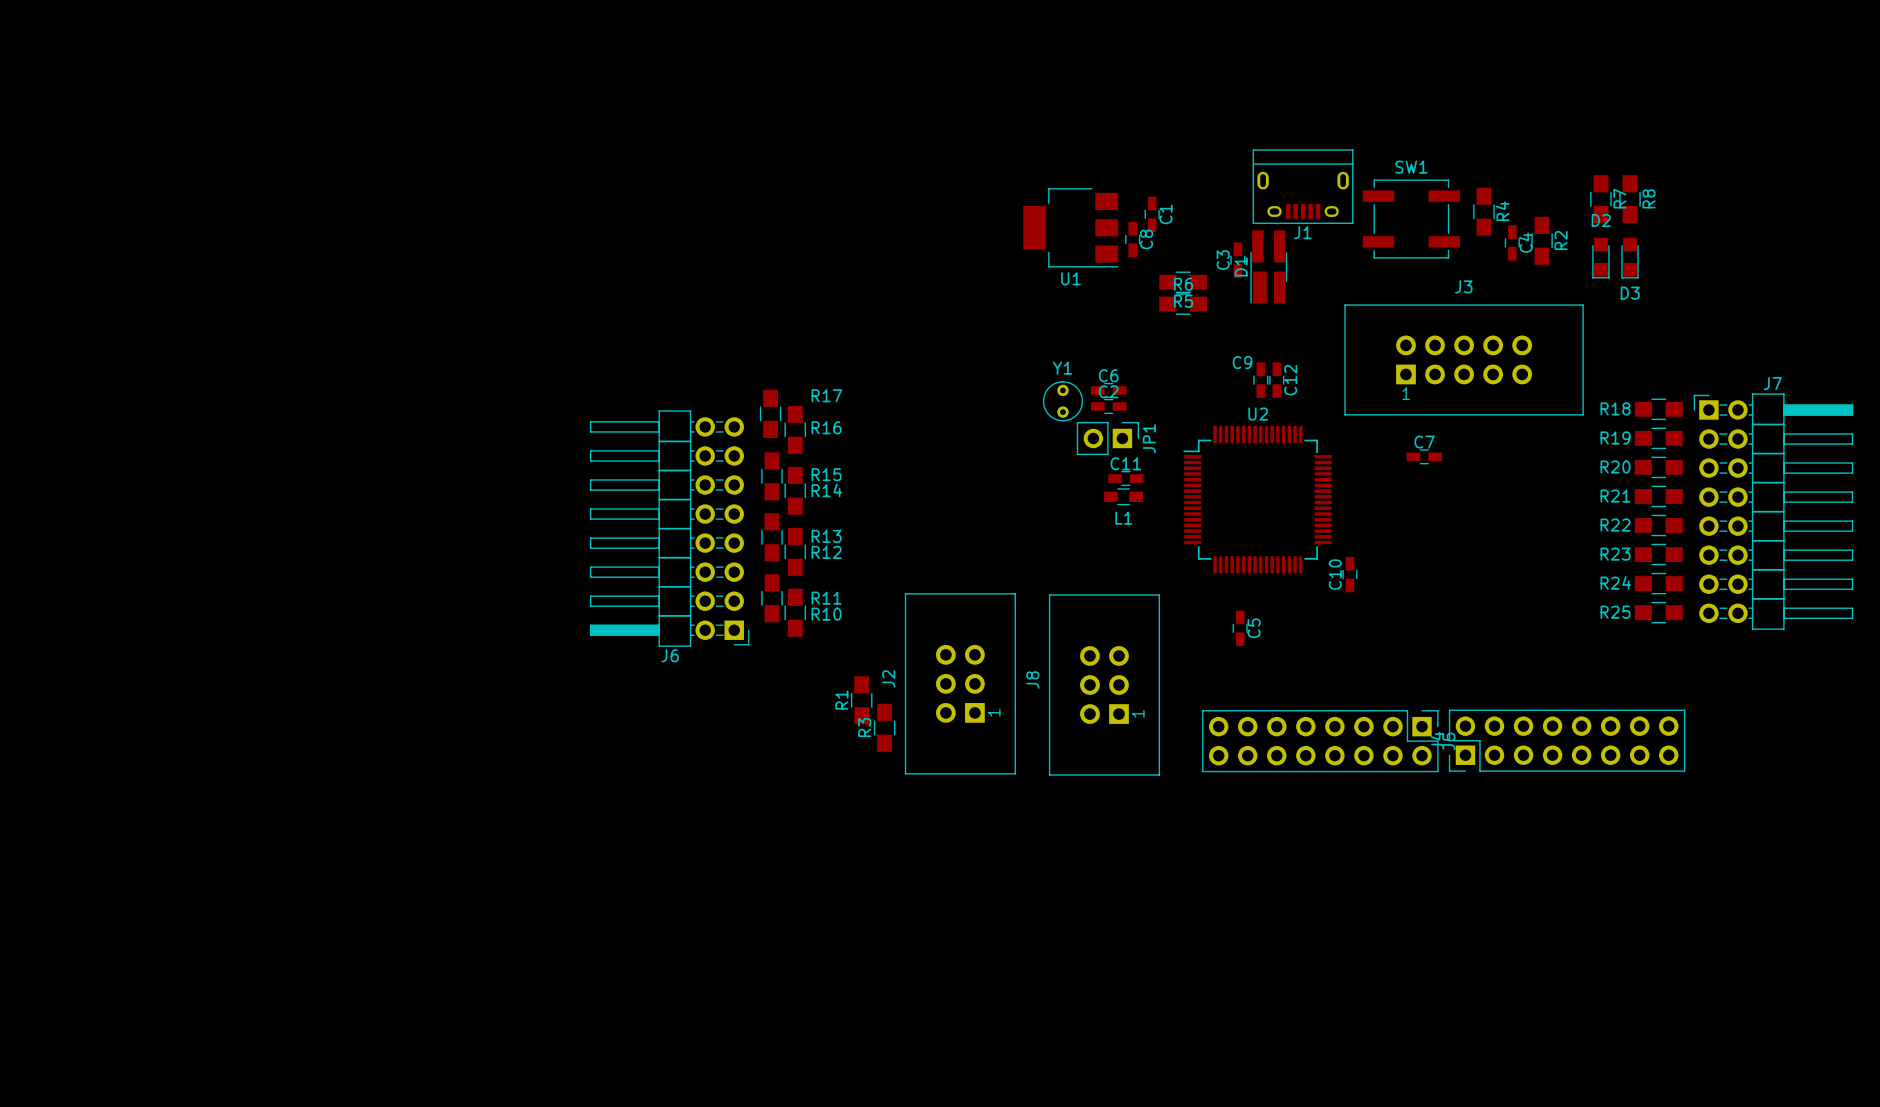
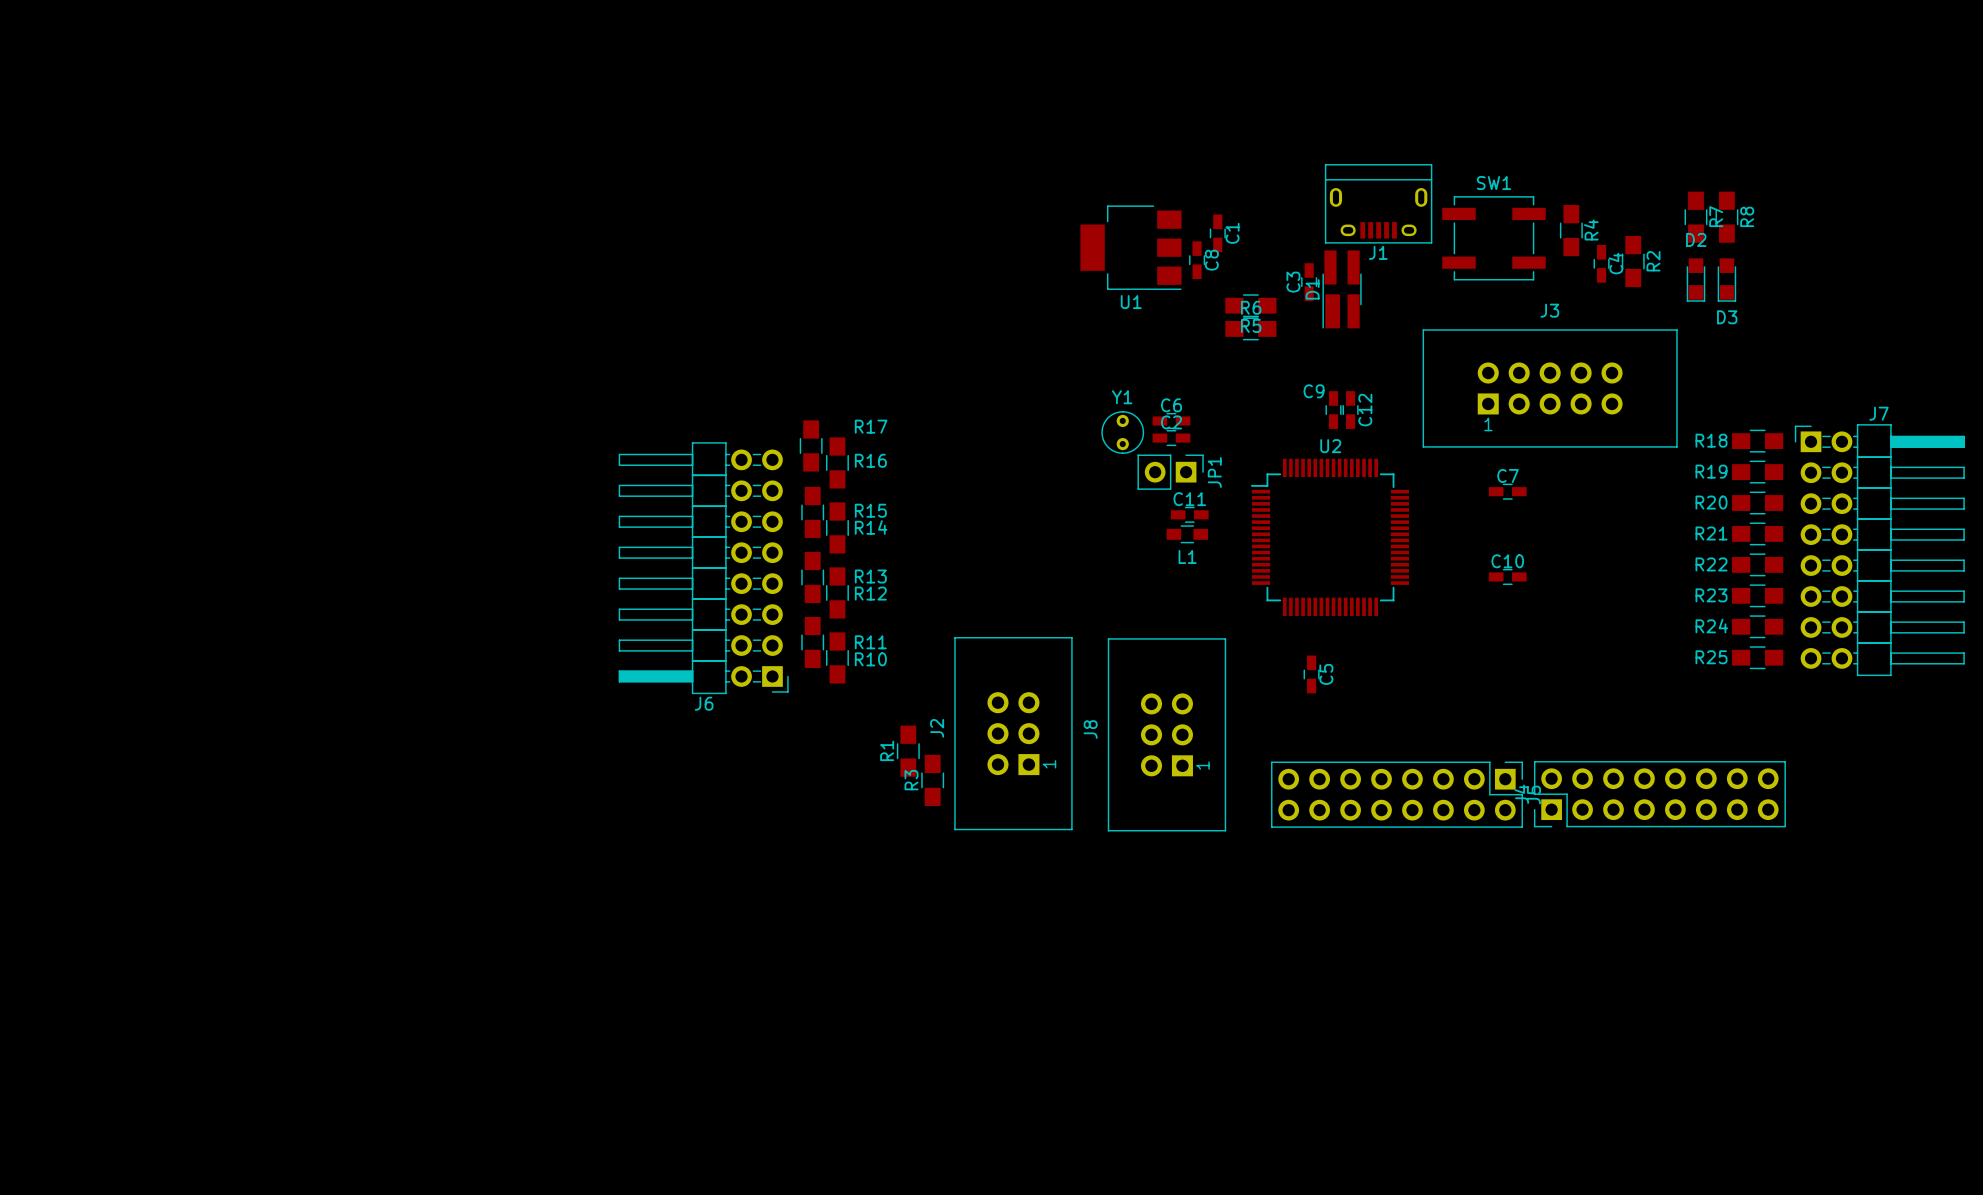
C10 rotation: 0° (1349, 574) -> 90° clockwise (1507, 576)
C10 position: (1349, 574) -> (1507, 576)

